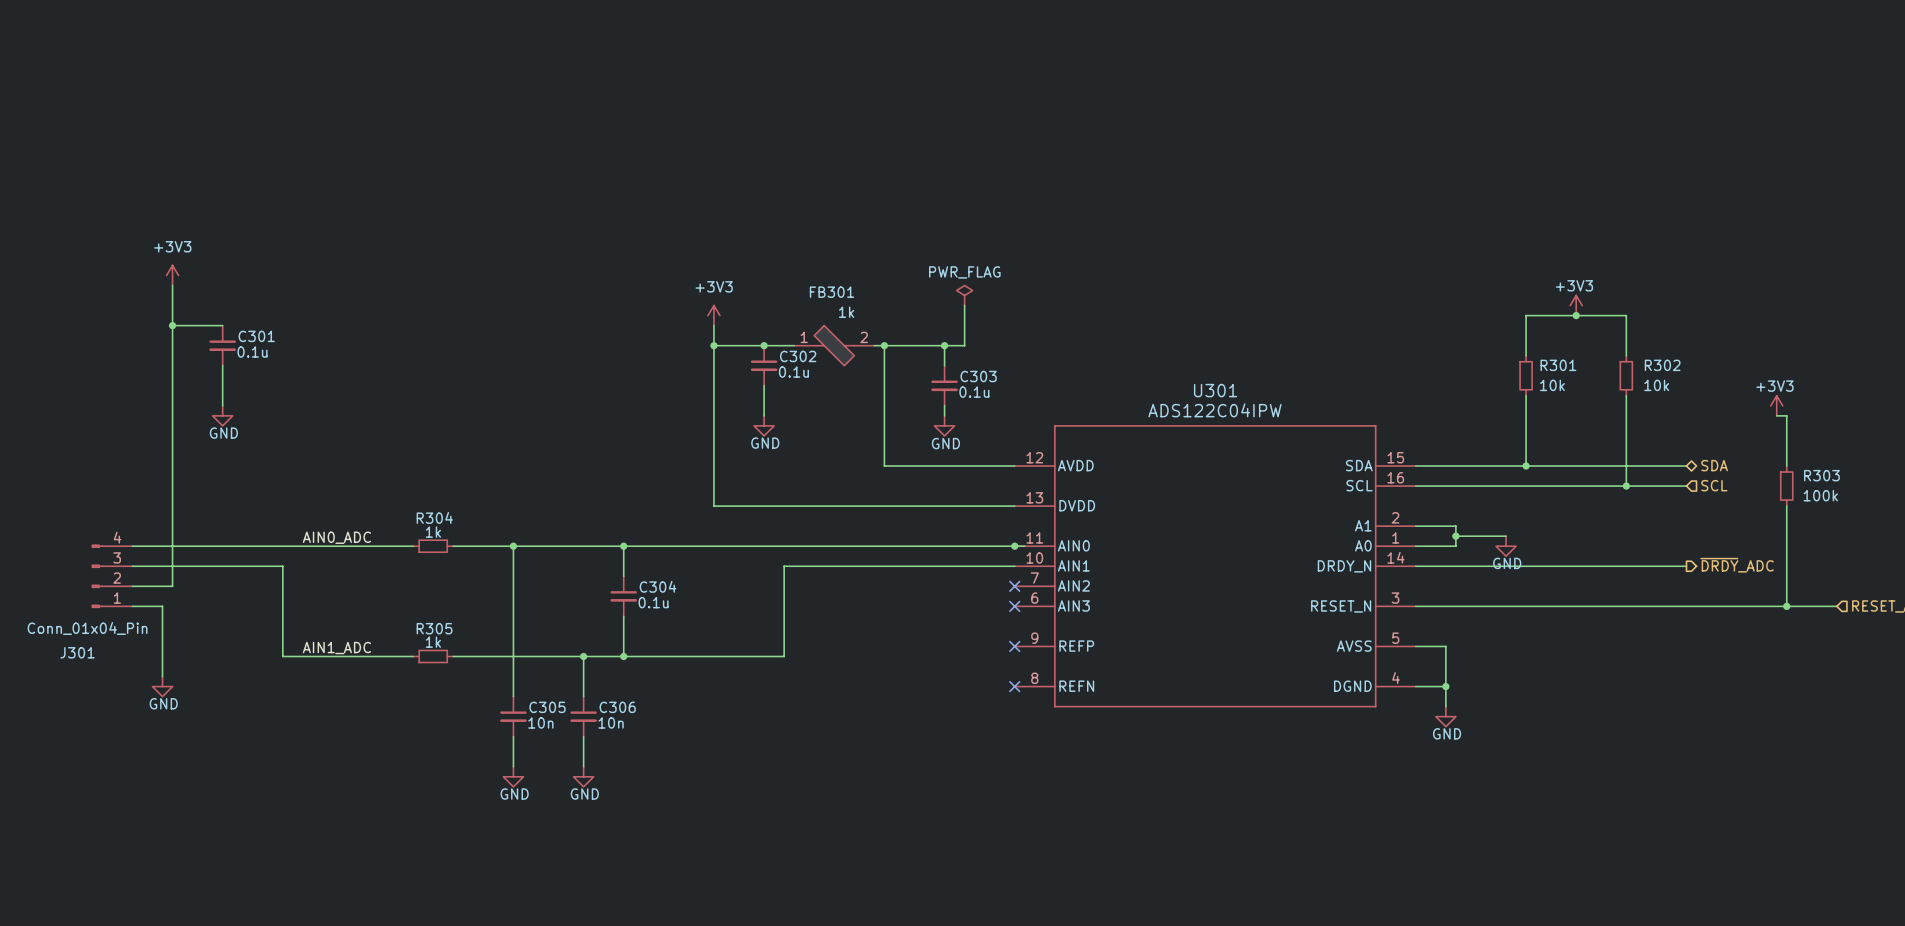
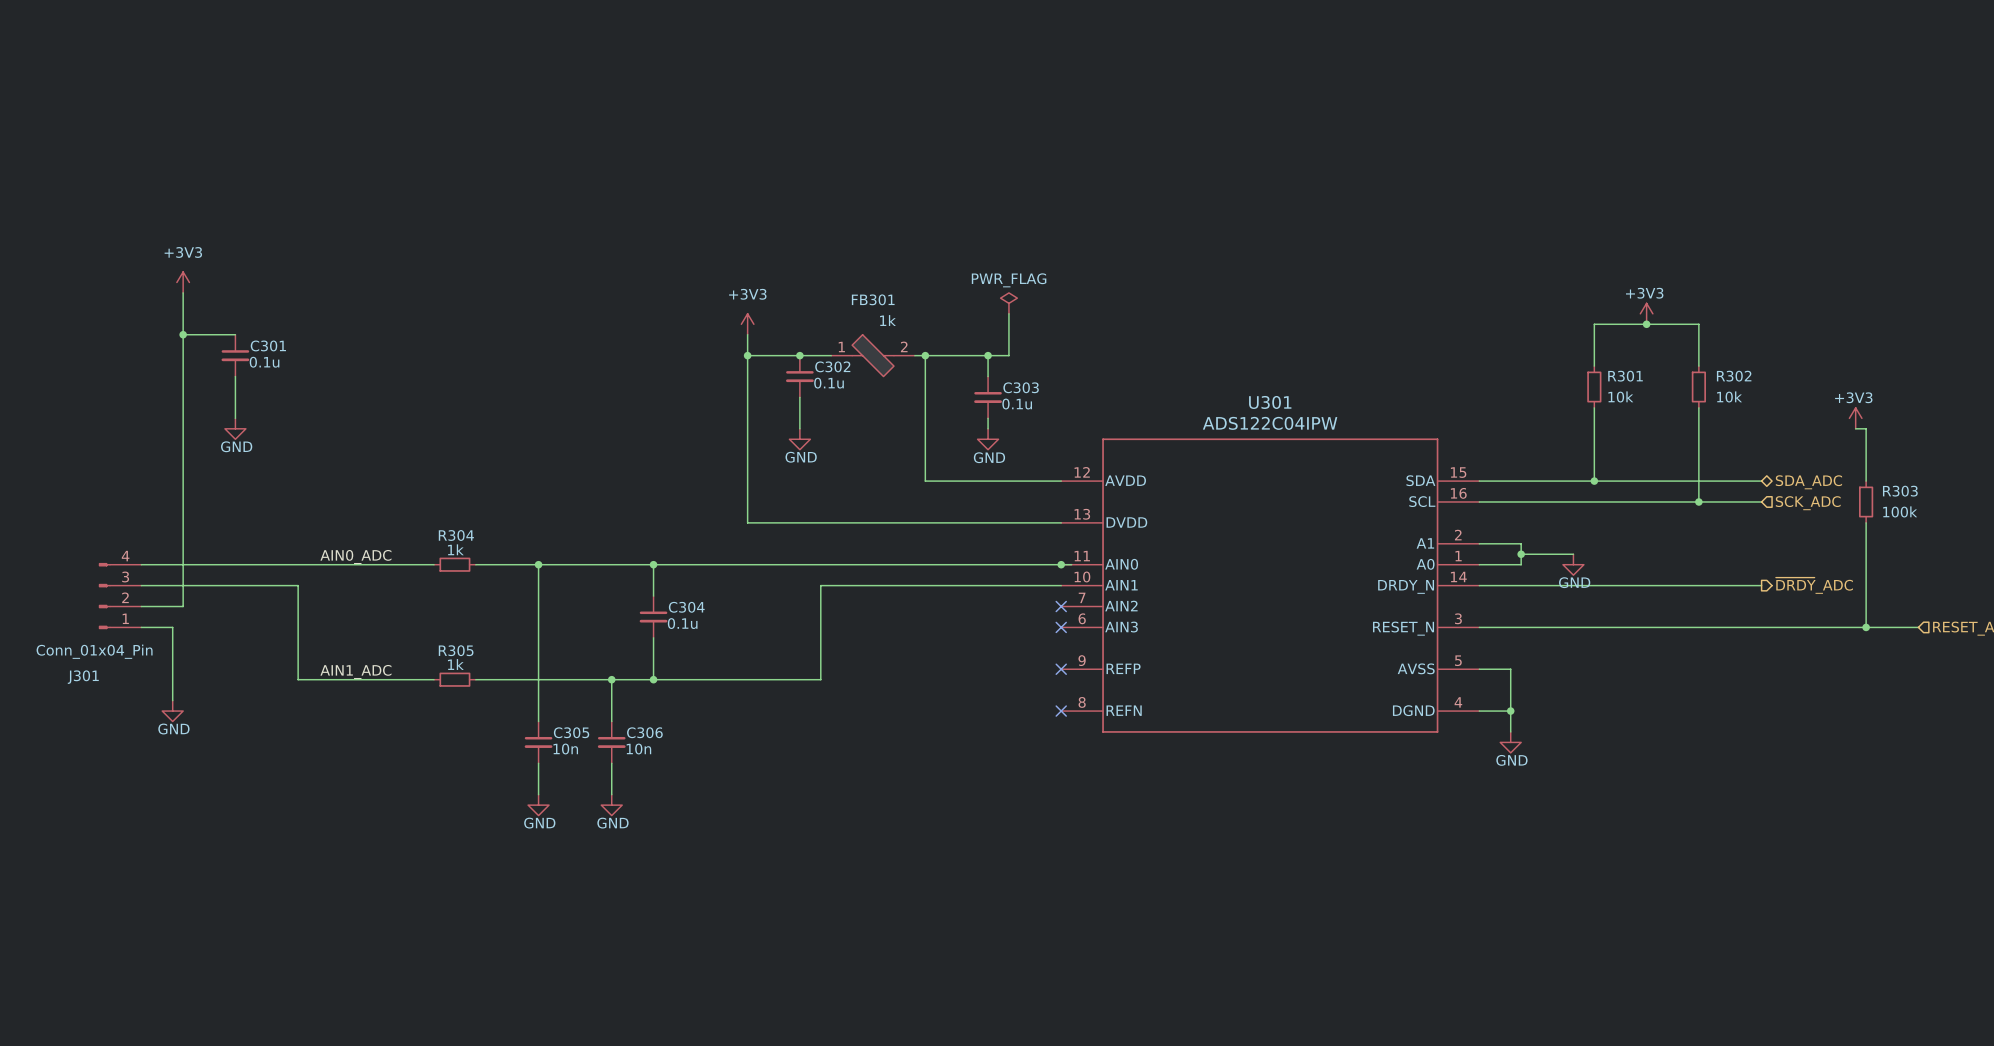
hierarchical label: SDA (1714, 465) -> SDA_ADC (1808, 482)
hierarchical label: SCL (1714, 485) -> SCK_ADC (1808, 503)

